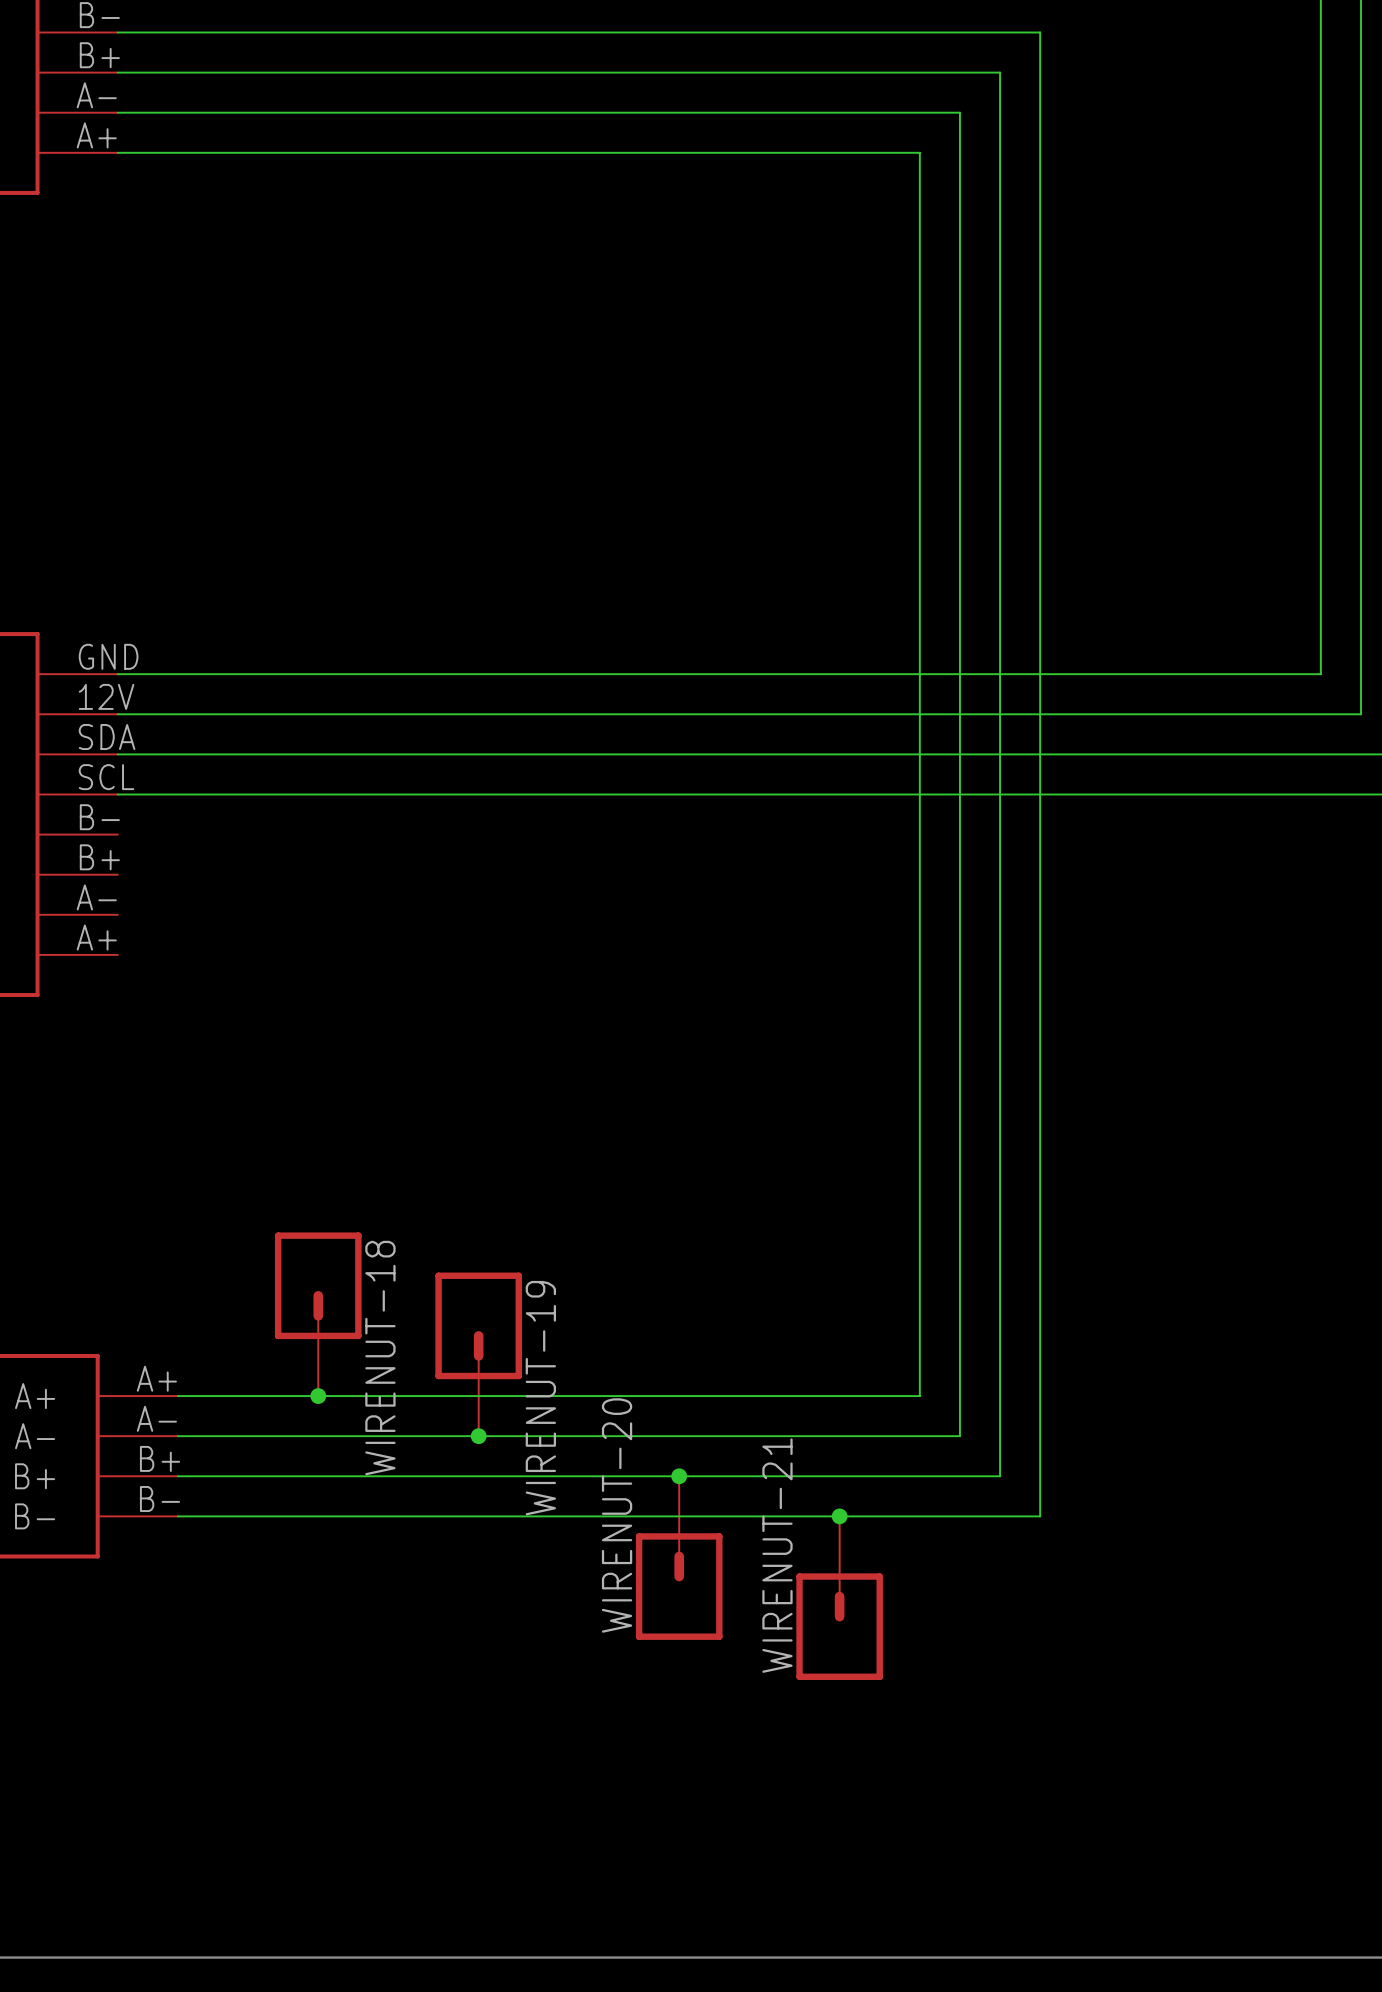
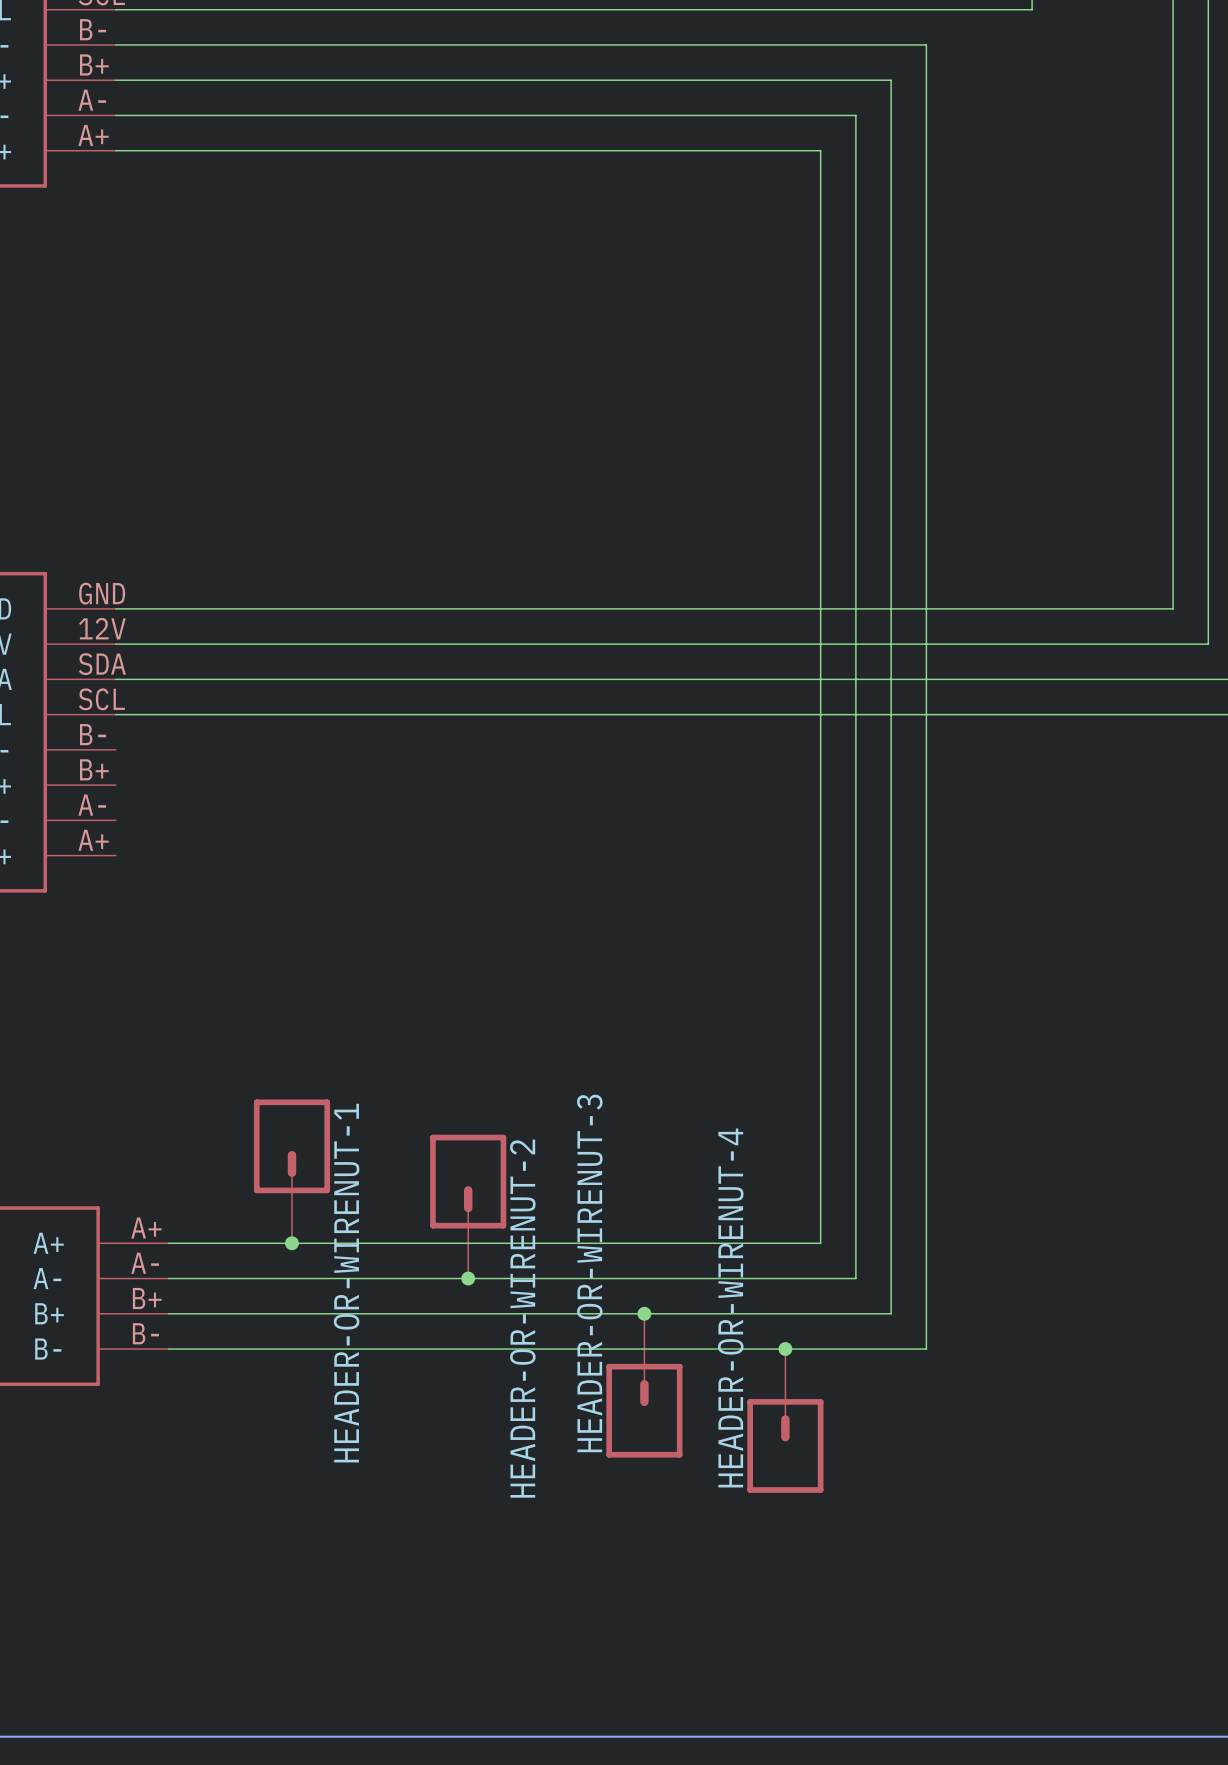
WIRENUT-19: (478, 1354) -> none
HEADER-OR-WIRENUT-2: none -> (468, 1206)
WIRENUT-18 name: WIRENUT-18 (380, 1358) -> HEADER-OR-WIRENUT-1 (346, 1283)
junction position: (478, 1436) -> (468, 1278)
junction position: (679, 1476) -> (644, 1313)
junction position: (839, 1516) -> (785, 1349)
WIRENUT-20: (679, 1558) -> none
HEADER-OR-WIRENUT-3: none -> (644, 1385)
WIRENUT-21: (839, 1598) -> none
HEADER-OR-WIRENUT-4: none -> (785, 1420)

